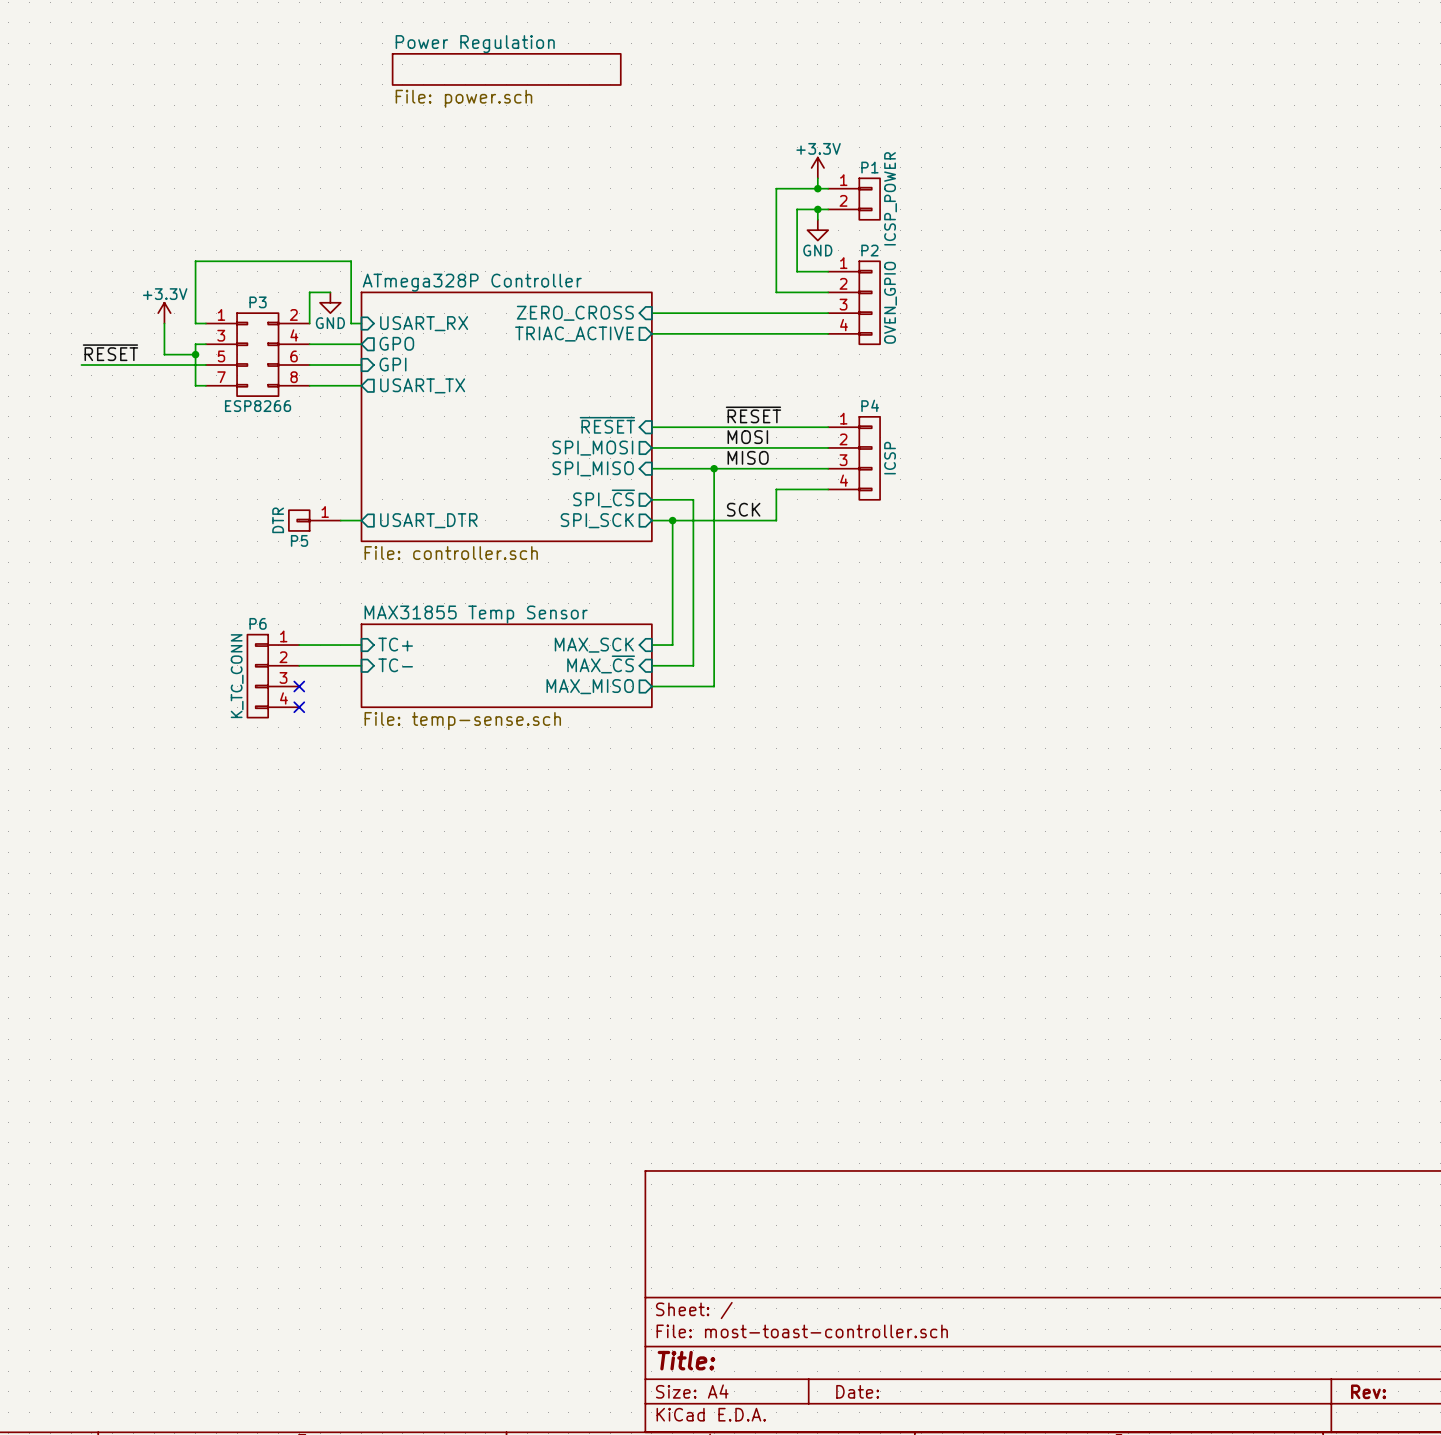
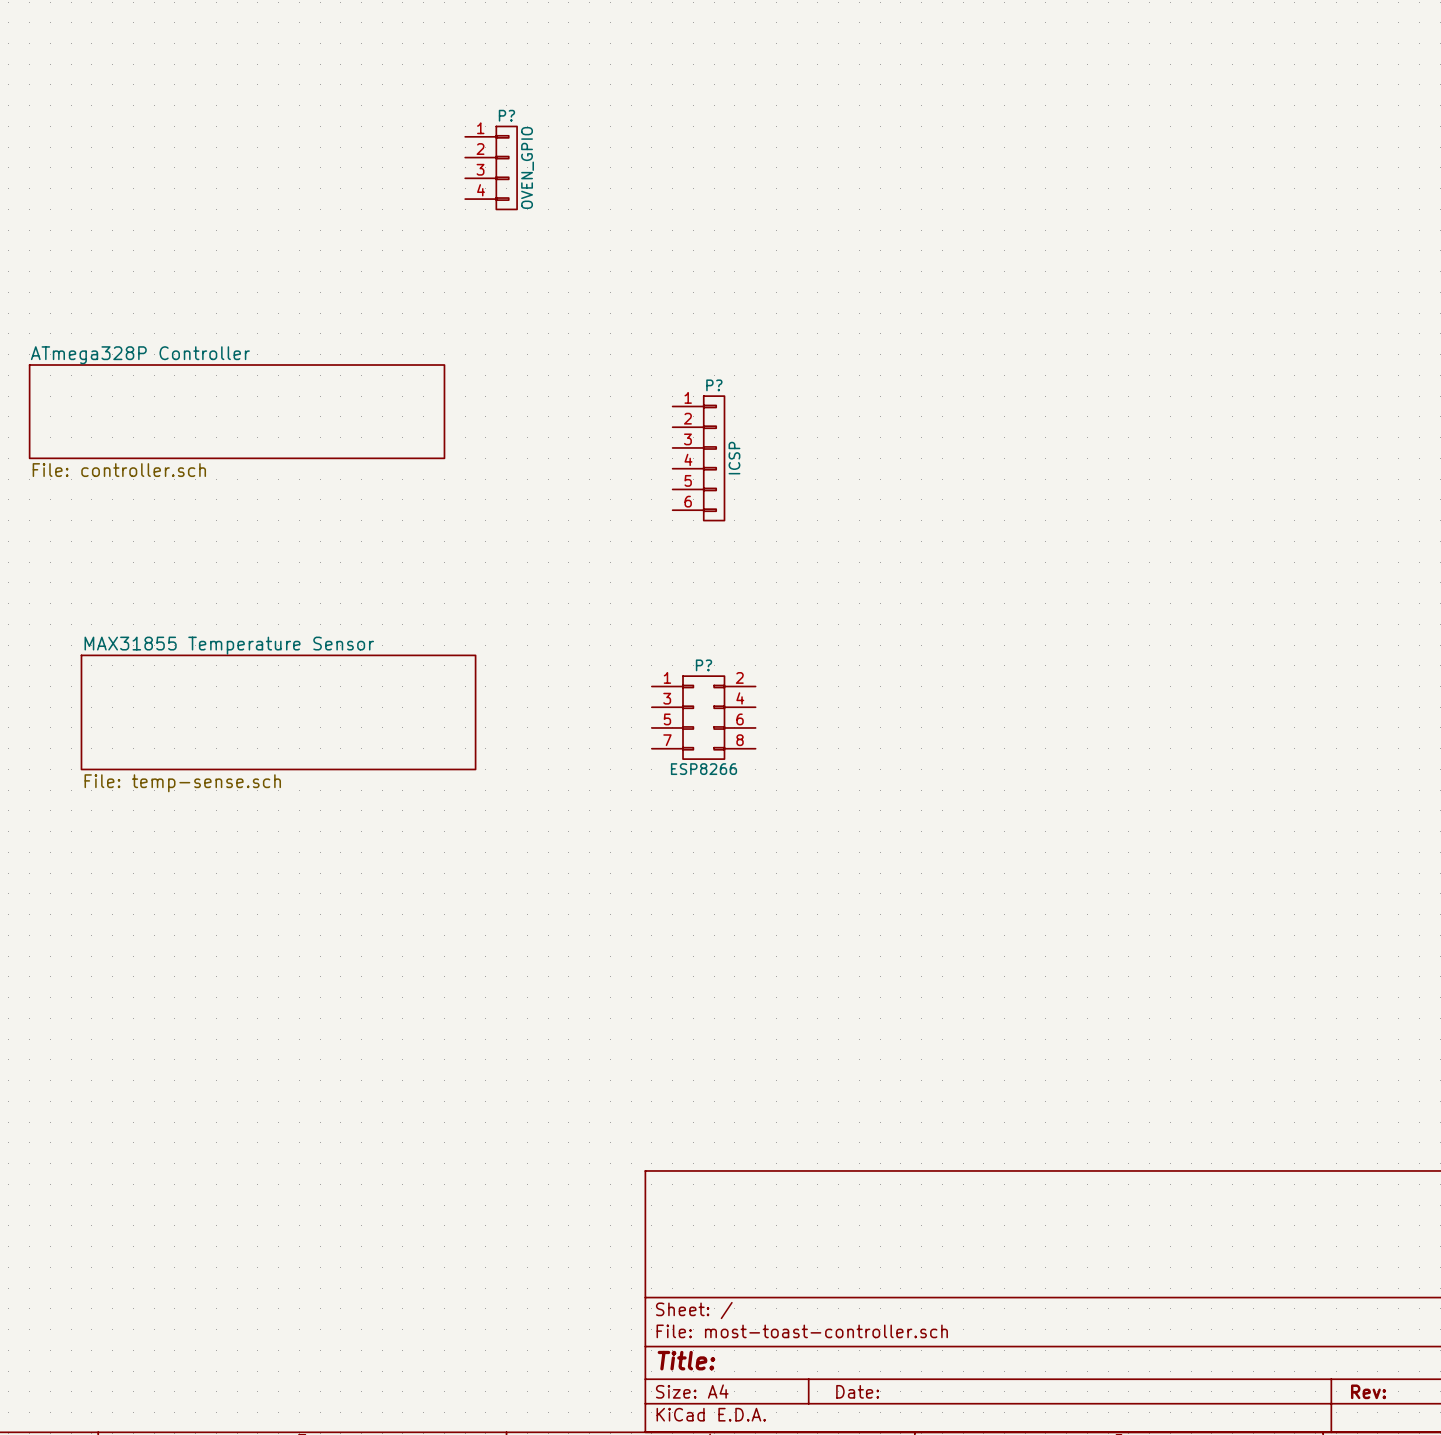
sheet Power Regulation: File: power.sch (506, 69) -> none
P?: none -> OVEN_GPIO (491, 167)
power symbol: +3.3V (817, 167) -> none
wire: (817, 178) (817, 188) -> none
junction: (817, 188) -> none
wire: (828, 188) (776, 188) (776, 292) (828, 292) -> none
P1: ICSP_POWER (854, 199) -> none
wire: (817, 209) (817, 219) -> none
junction: (817, 209) -> none
wire: (828, 209) (797, 209) (797, 271) (828, 271) -> none
power symbol: GND (817, 230) -> none
sheet ATmega328P Controller name position: ATmega328P Controller (472, 282) -> ATmega328P Controller (140, 355)
wire: (330, 292) (309, 292) (309, 323) -> none
sheet ATmega328P Controller shape: [361, 292, 652, 542] -> [29, 365, 445, 459]
power symbol: GND (330, 302) -> none
P2: OVEN_GPIO (854, 302) -> none
power symbol: +3.3V (164, 313) -> none
sheet pin: ZERO_CROSS (575, 313) -> none
wire: (651, 313) (828, 313) -> none
wire: (164, 323) (164, 354) (195, 354) -> none
wire: (205, 323) (195, 323) (195, 261) (351, 261) (351, 323) (361, 323) -> none
sheet pin: USART_RX (424, 323) -> none
wire: (651, 333) (828, 333) -> none
sheet pin: TRIAC_ACTIVE (574, 334) -> none
sheet pin: GPO (396, 343) -> none
wire: (205, 344) (195, 344) (195, 385) (205, 385) -> none
wire: (309, 344) (361, 344) -> none
label: ~{RESET} (110, 352) -> none
junction: (195, 354) -> none
P3: ESP8266 (257, 354) -> none
sheet pin: GPI (392, 364) -> none
wire: (309, 385) (361, 385) -> none
sheet pin: USART_TX (422, 385) -> none
label: ~{RESET} (753, 414) -> none
sheet pin: ~{RESET} (607, 425) -> none
wire: (651, 427) (828, 427) -> none
label: MOSI (747, 437) -> none
wire: (651, 447) (828, 447) -> none
sheet pin: SPI_MOSI (592, 448) -> none
label: MISO (748, 457) -> none
P?: none -> ICSP (698, 458)
P4: ICSP (854, 458) -> none
sheet pin: SPI_MISO (593, 468) -> none
wire: (651, 468) (828, 468) -> none
wire: (714, 468) (714, 686) (651, 686) -> none
junction: (714, 468) -> none
wire: (828, 489) (776, 489) (776, 520) (651, 520) -> none
sheet pin: SPI_~{CS} (604, 498) -> none
wire: (651, 499) (693, 499) (693, 665) (651, 665) -> none
label: SCK (743, 509) -> none
P5: DTR (314, 520) -> none
wire: (340, 520) (361, 520) -> none
sheet pin: USART_DTR (428, 520) -> none
sheet pin: SPI_SCK (597, 520) -> none
wire: (672, 520) (672, 645) (651, 645) -> none
junction: (672, 520) -> none
sheet ATmega328P Controller value position: File: controller.sch (451, 553) -> File: controller.sch (119, 470)
sheet pin: TC+ (395, 644) -> none
wire: (299, 645) (361, 645) -> none
sheet pin: MAX_SCK (594, 645) -> none
sheet pin: MAX_~{CS} (601, 664) -> none
wire: (299, 665) (361, 665) -> none
sheet pin: TC- (395, 665) -> none
sheet MAX31855 Temp Sensor: File: temp-sense.sch (506, 665) -> none
P6: K_TC_CONN (273, 676) -> none
no-connect mark: (299, 686) -> none
sheet pin: MAX_MISO (590, 686) -> none
no-connect mark: (299, 707) -> none
sheet MAX31855 Temperature Sensor: none -> File: temp-sense.sch (278, 712)
P?: none -> ESP8266 (703, 717)

